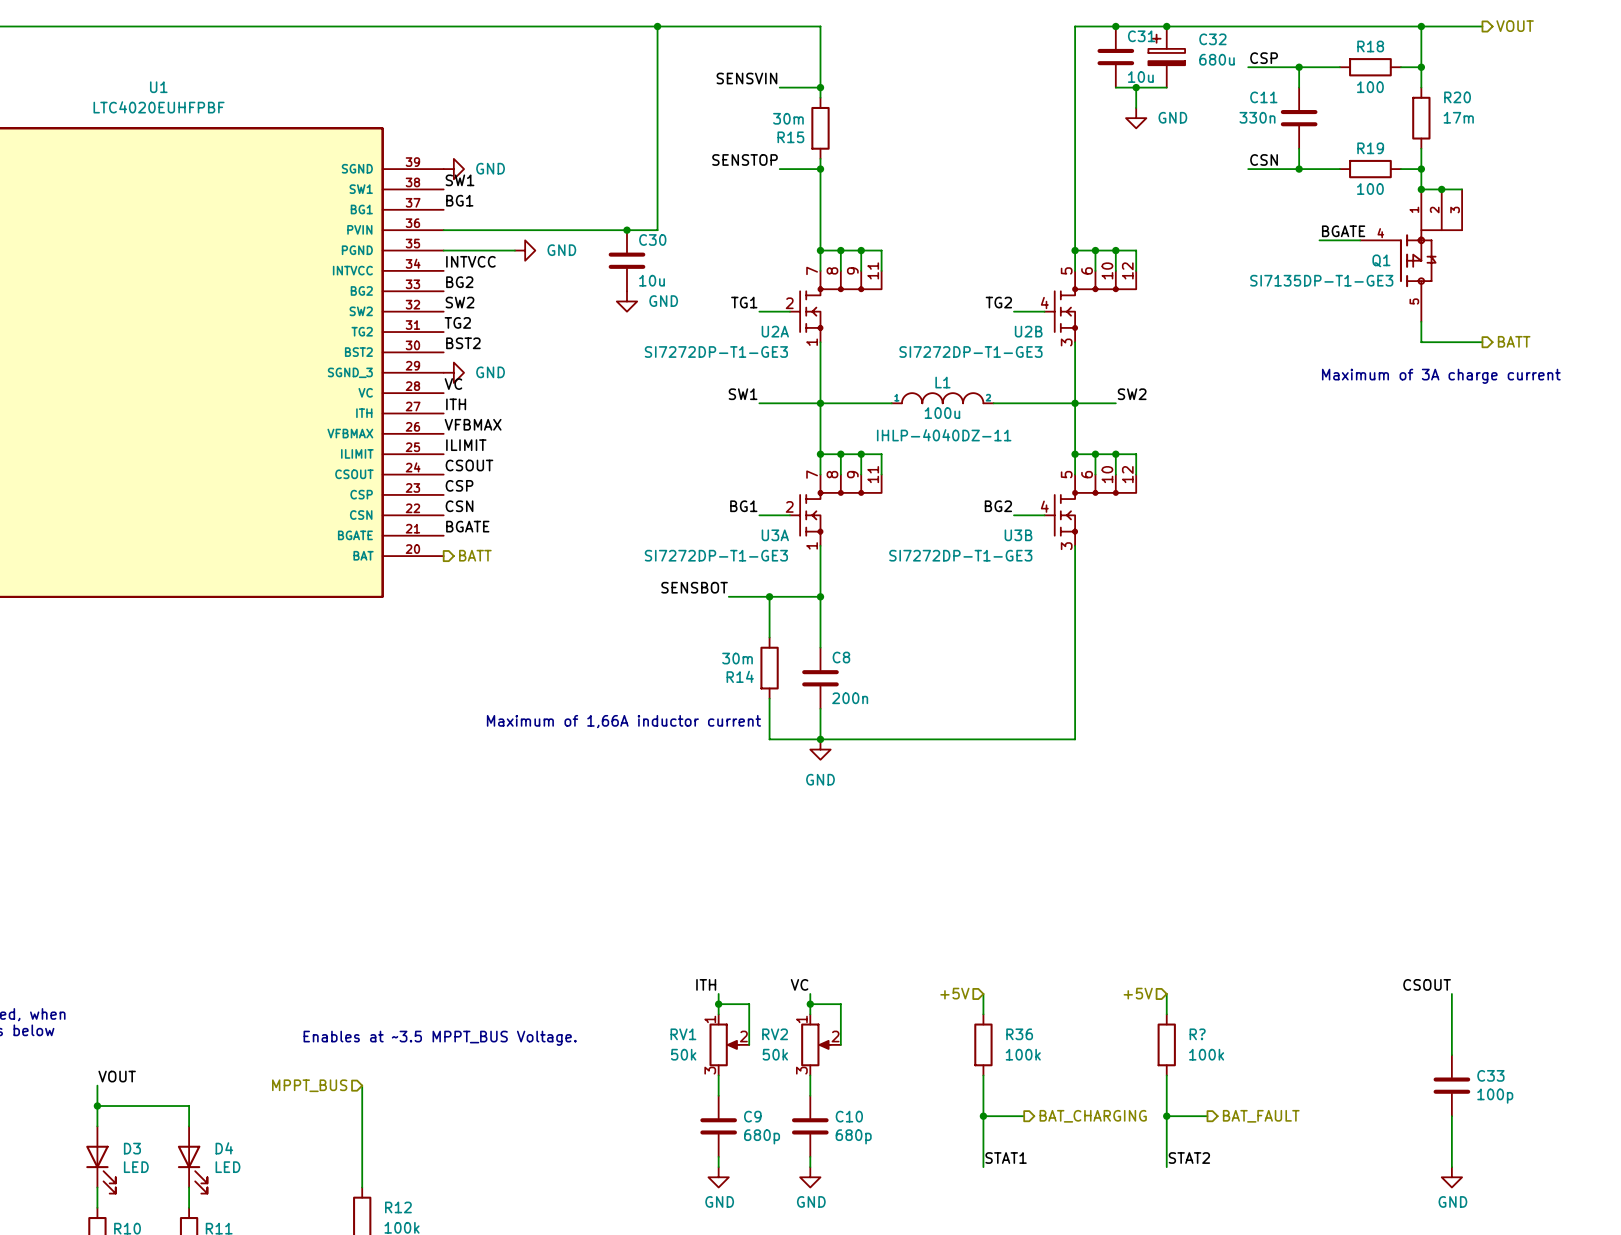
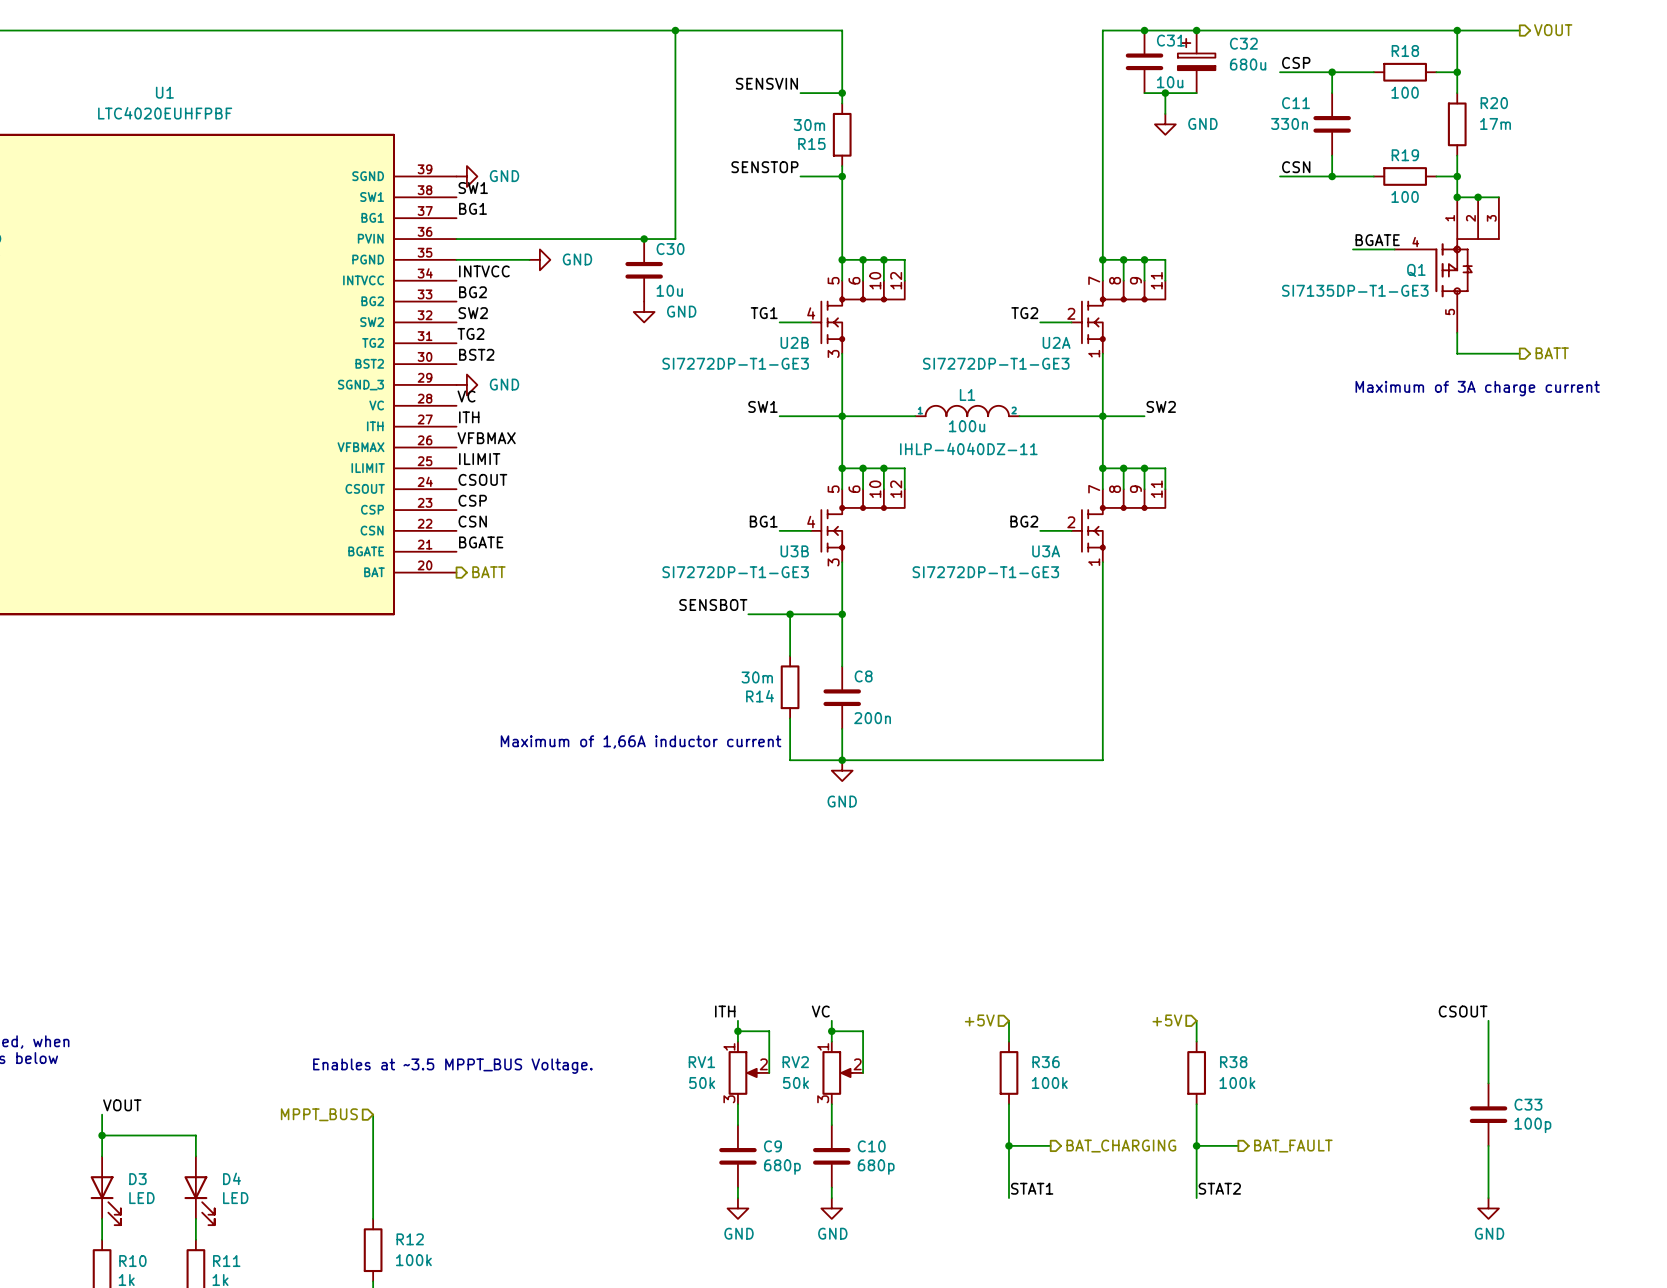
U2A position: (835, 306) -> (1118, 317)
U2B position: (1090, 306) -> (857, 317)
U3A position: (835, 510) -> (1118, 525)
U3B position: (1090, 510) -> (857, 525)
U3A name position: U3A (775, 535) -> U3A (1046, 551)
U3B name position: U3B (1018, 535) -> U3B (794, 551)
R? name: R? (1197, 1034) -> R38 (1233, 1062)

